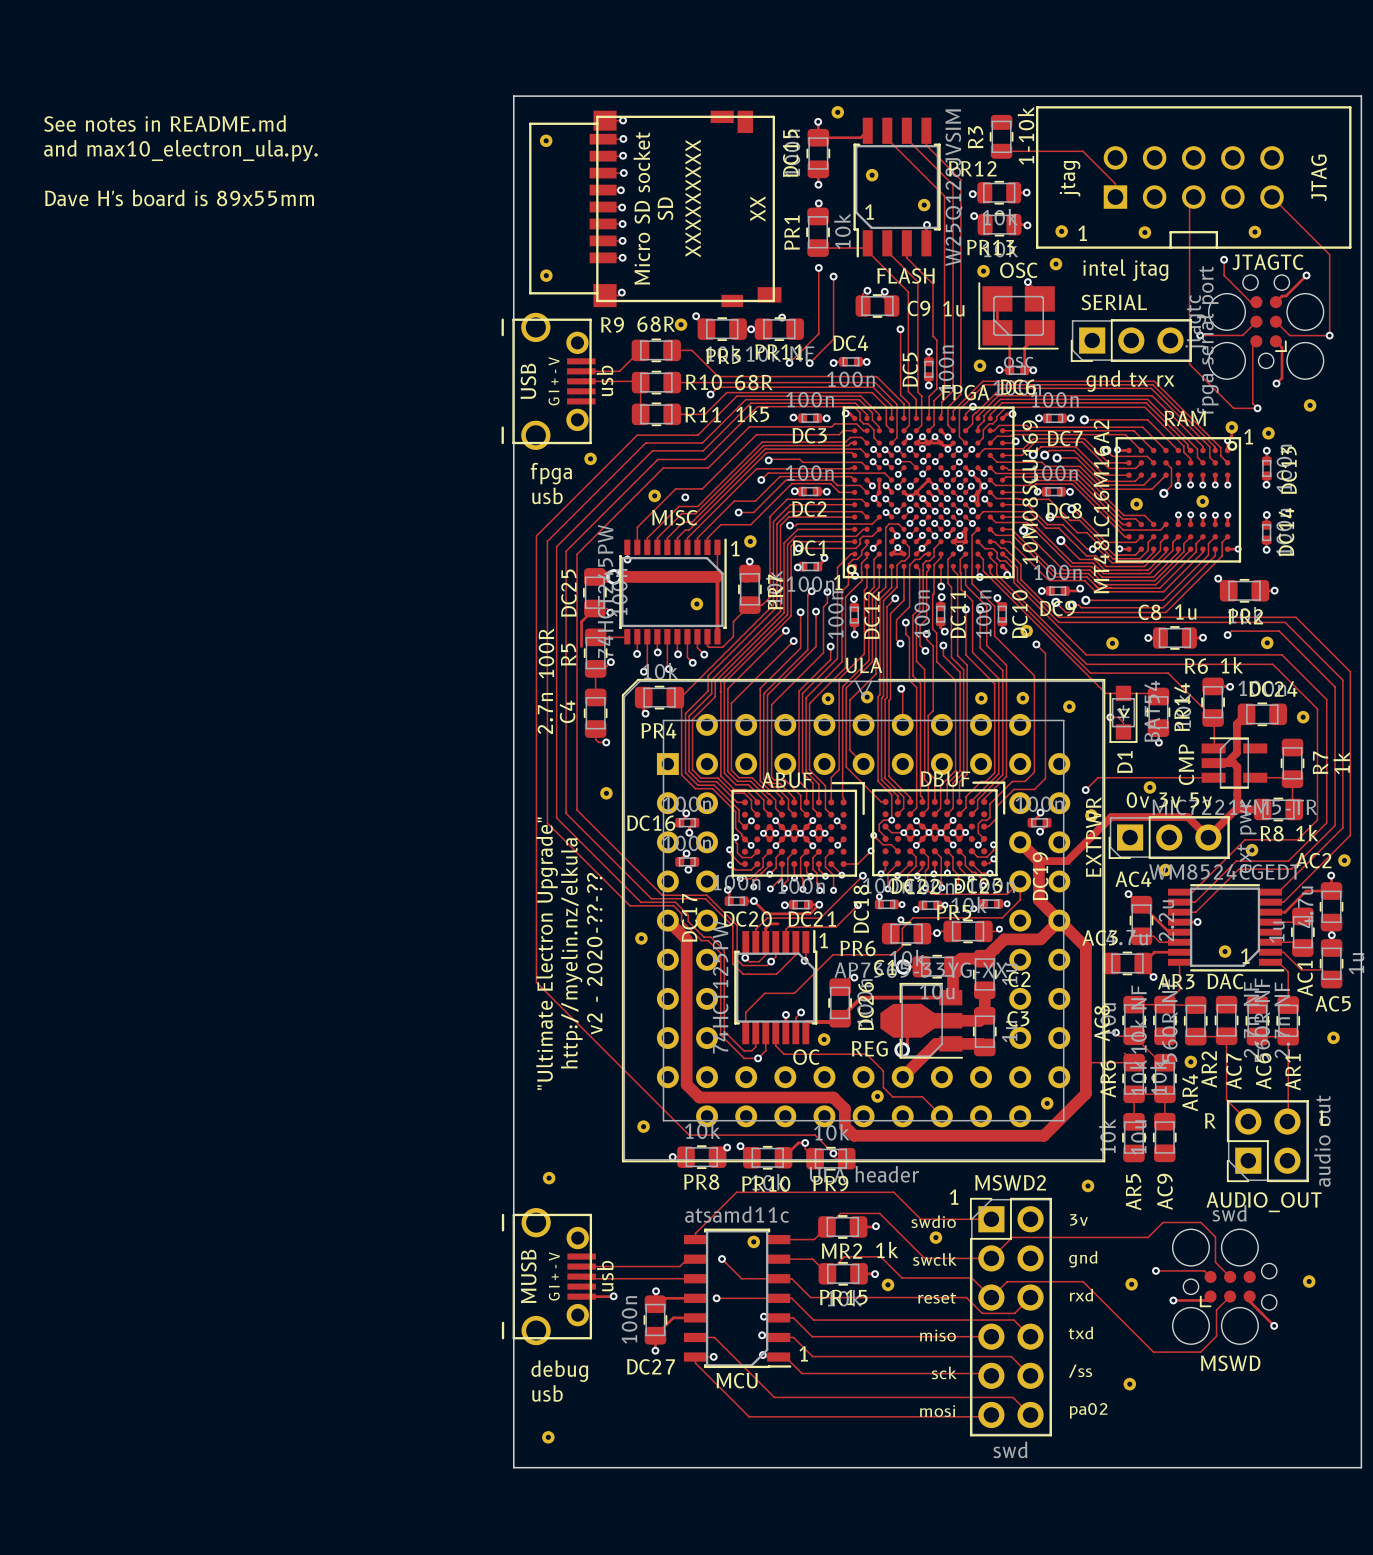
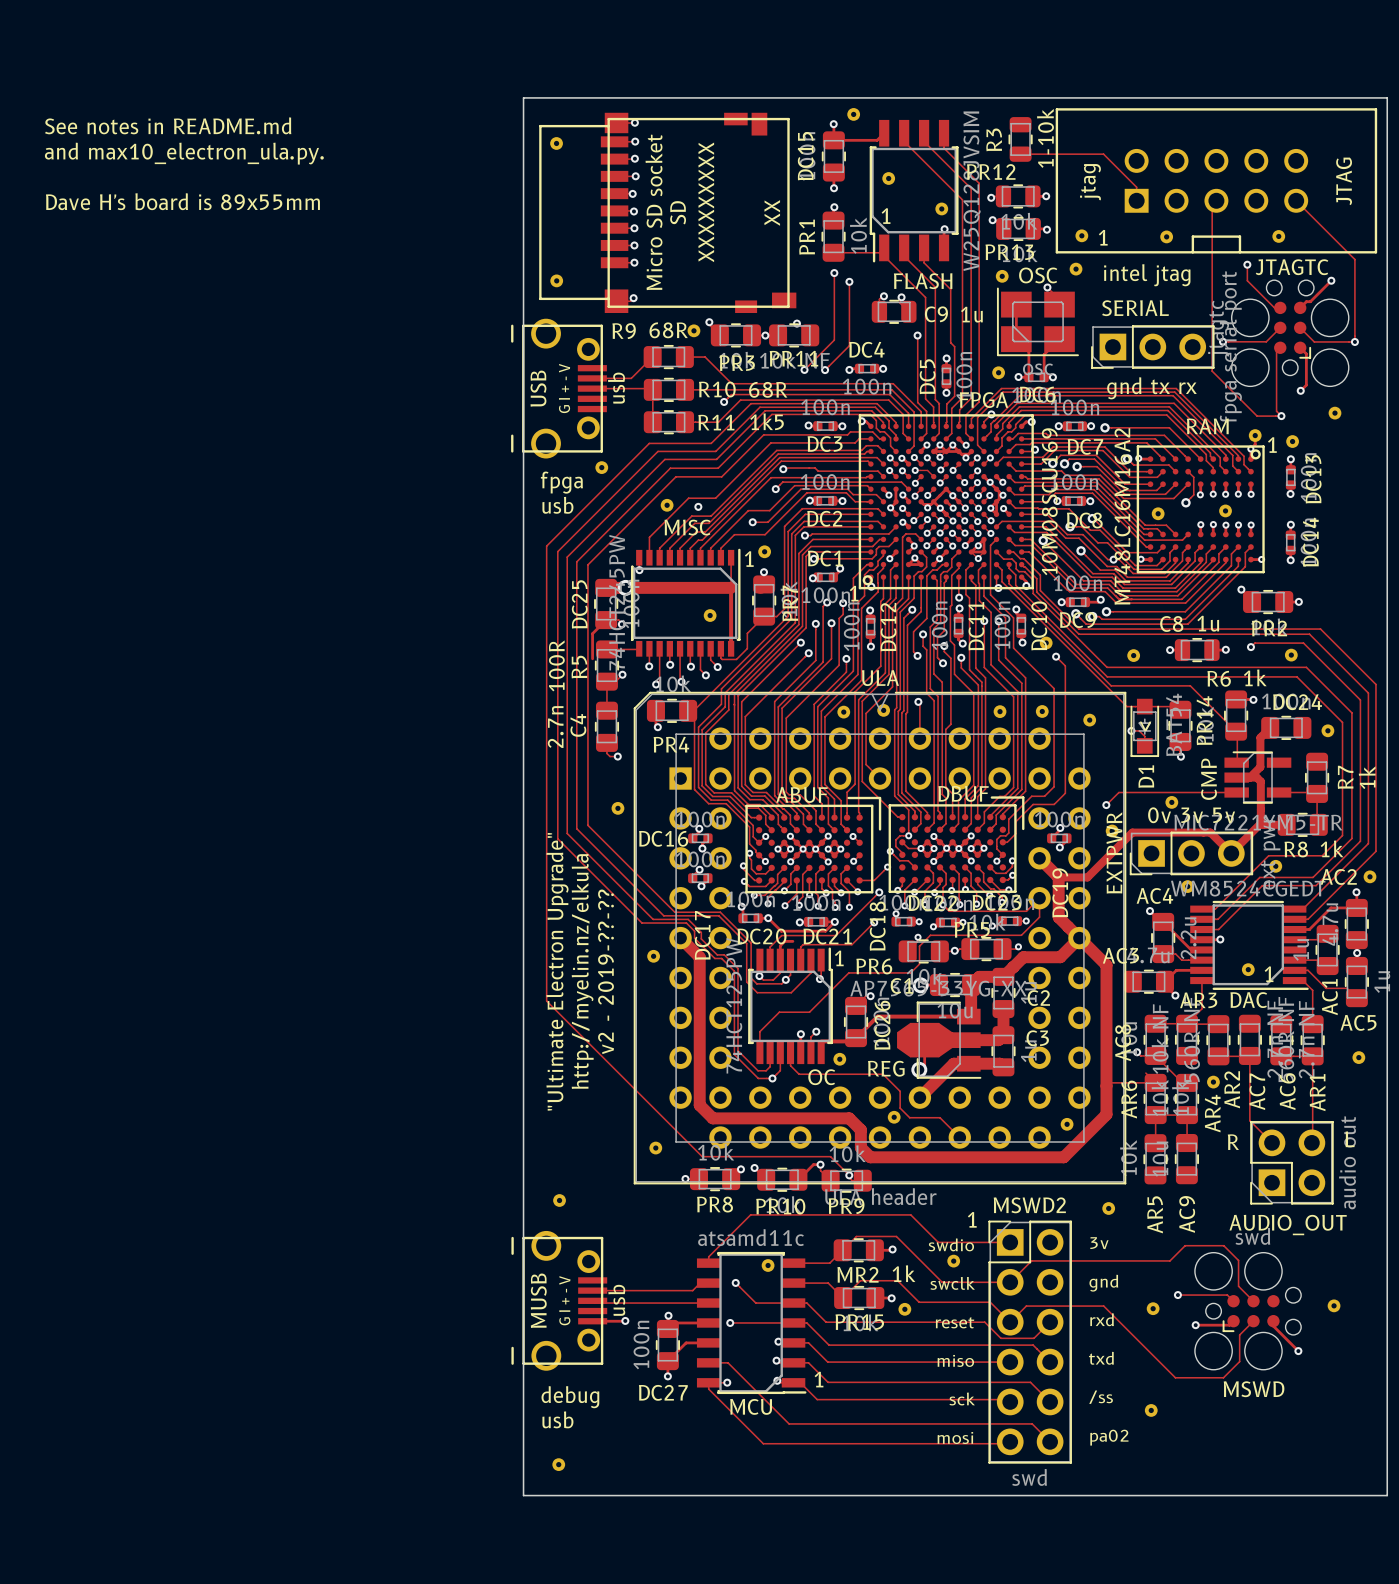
text: v2 - 2020-??-?? (594, 953) -> v2 - 2019-??-?? (606, 971)

